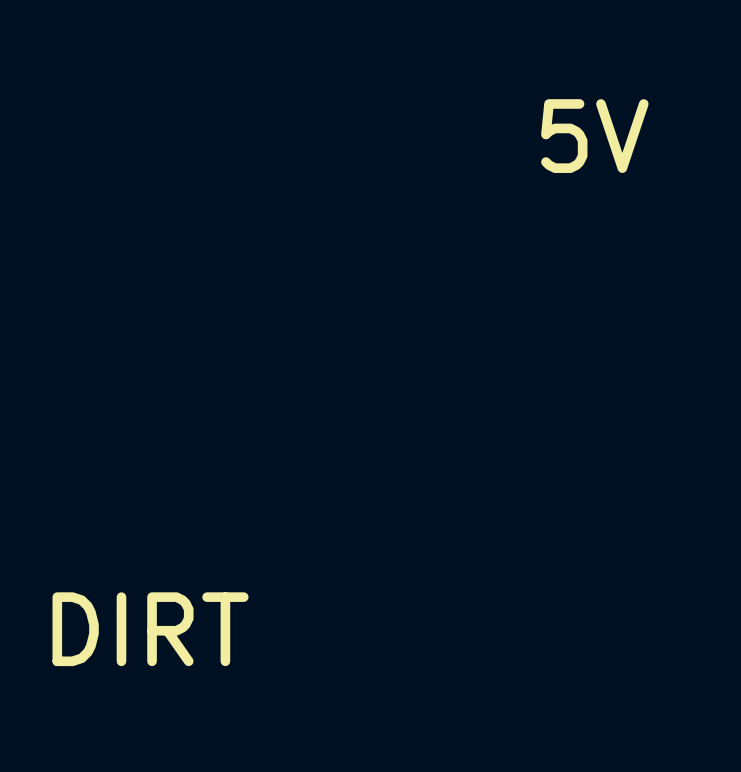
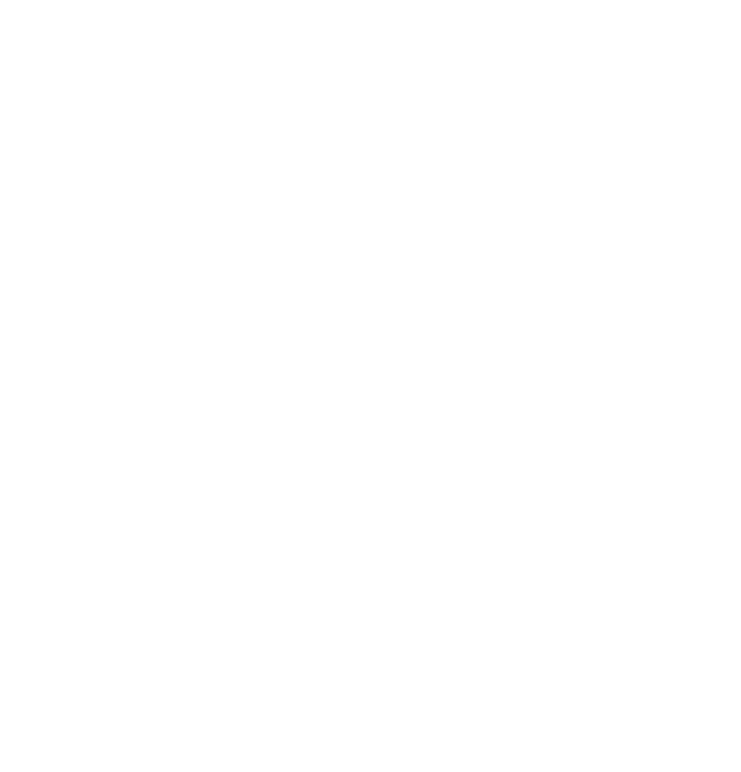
text: 5V (594, 136) -> none
text: DIRT (150, 629) -> none

